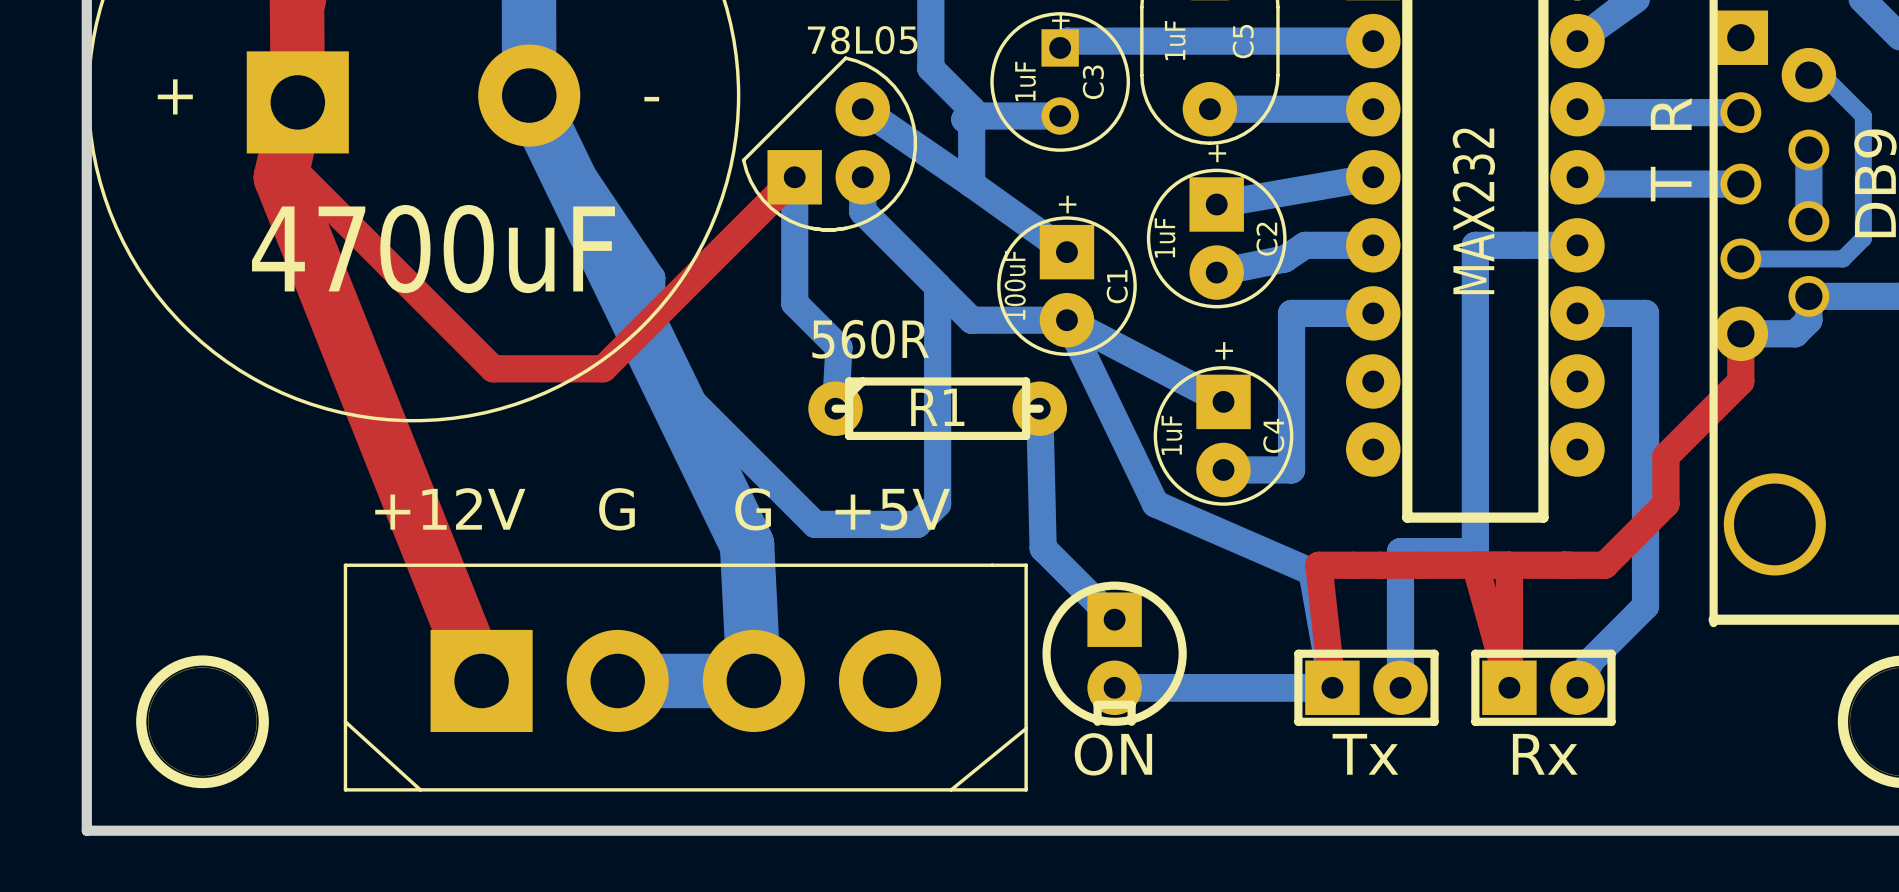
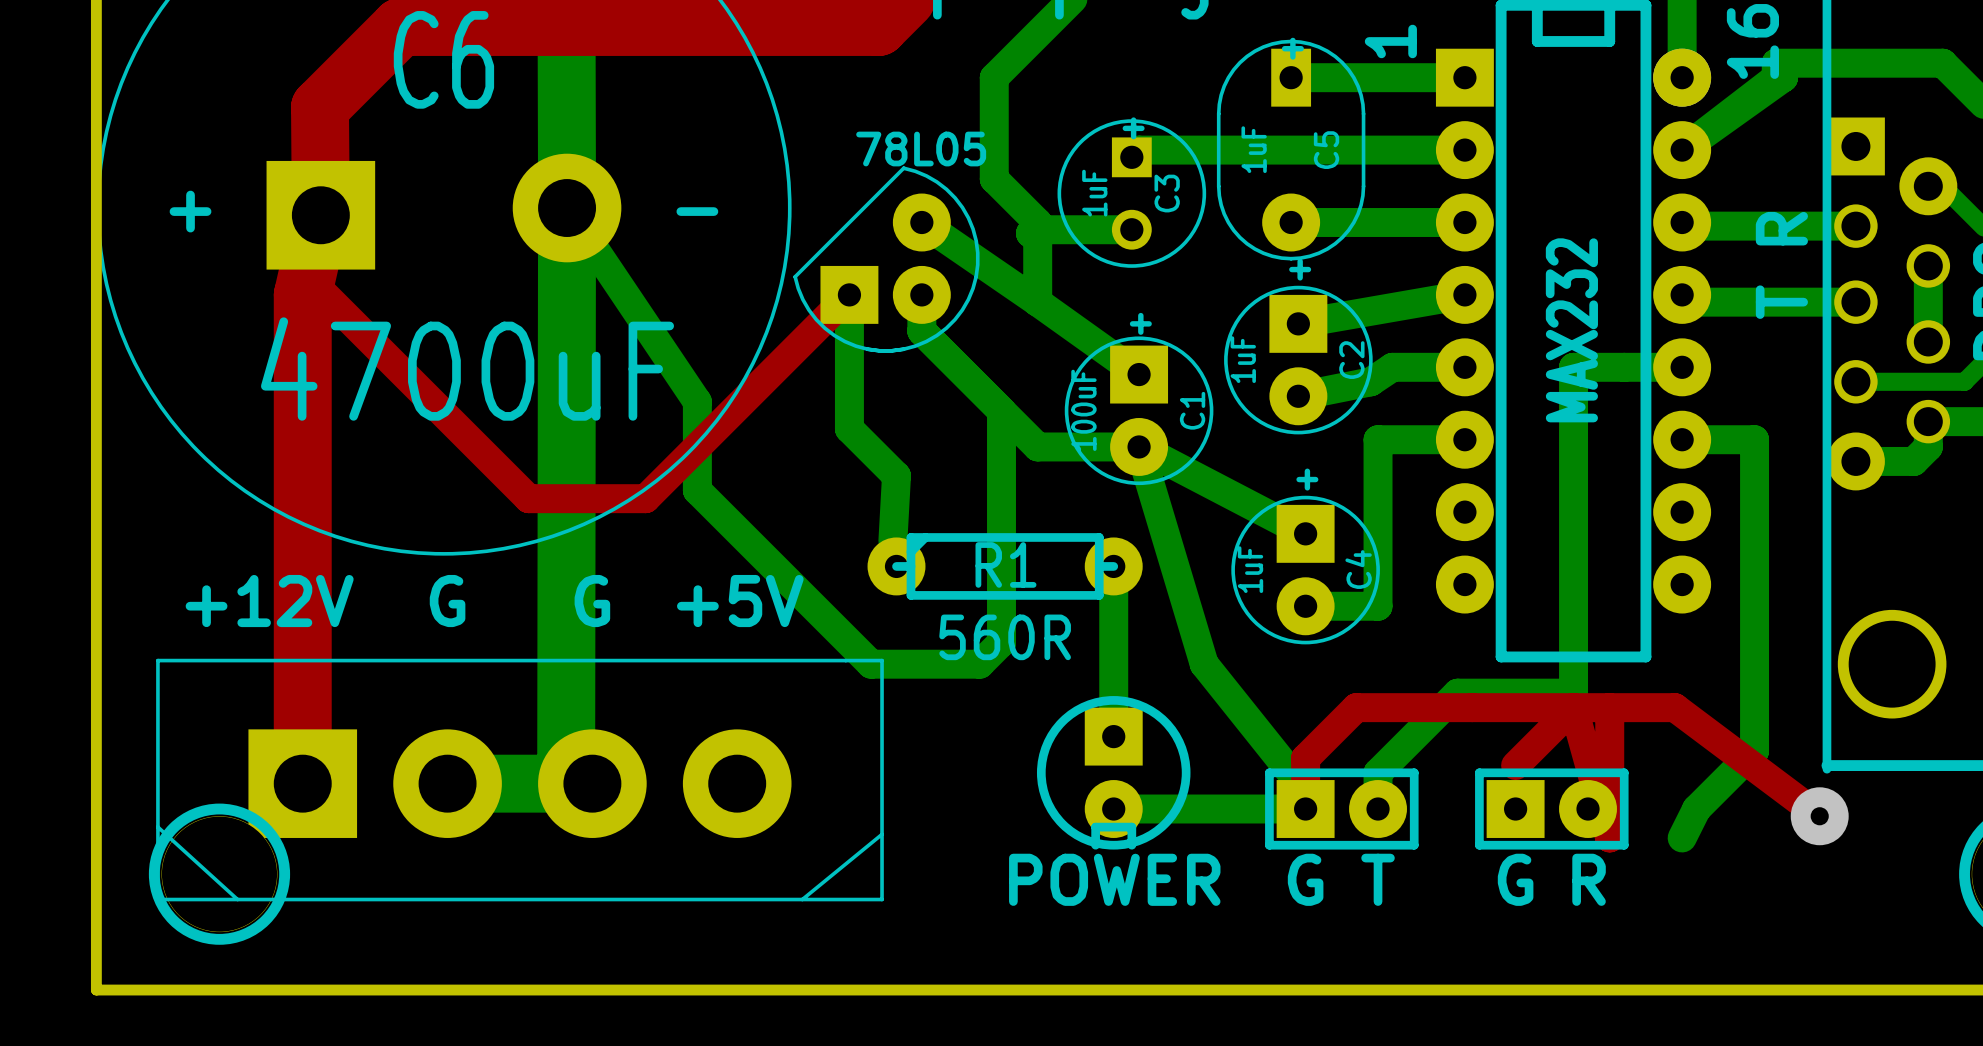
bottom track: (529, 95) (747, 544) (753, 680) (617, 680) -> (567, 208) (566, 771) (592, 783) (447, 783)
top track: (280, 177) (481, 680) -> (302, 295) (302, 783)
bottom track: (1066, 320) (1155, 503) (1312, 572) (1332, 687) (1107, 687) -> (1139, 446) (1204, 664) (1305, 791) (1305, 809) (1113, 809)
top track: (1740, 333) (1740, 381) (1665, 456) (1665, 503) (1604, 565) (1570, 565) -> (1819, 816) (1674, 707)
R1 value position: 560R (870, 339) -> 560R (1005, 637)
R1 position: (937, 408) -> (1005, 566)
bottom track: (1039, 408) (1043, 548) (1114, 619) -> none
bottom track: none -> (1113, 566) (1113, 736)
bottom track: (1400, 551) (1400, 687) -> (1493, 693) (1457, 693) (1378, 772) (1378, 809)
top track: (1318, 565) (1332, 687) -> (1406, 707) (1356, 707) (1305, 758) (1305, 809)
top track: none -> (1573, 707) (1515, 765)
part: none -> (1113, 772)
part: (1114, 653) -> none
part: none -> (1341, 809)
part: none -> (1551, 809)
via: none -> (1819, 816)
part position: (685, 677) -> (519, 780)
part: (1366, 687) -> none
part: (1543, 687) -> none

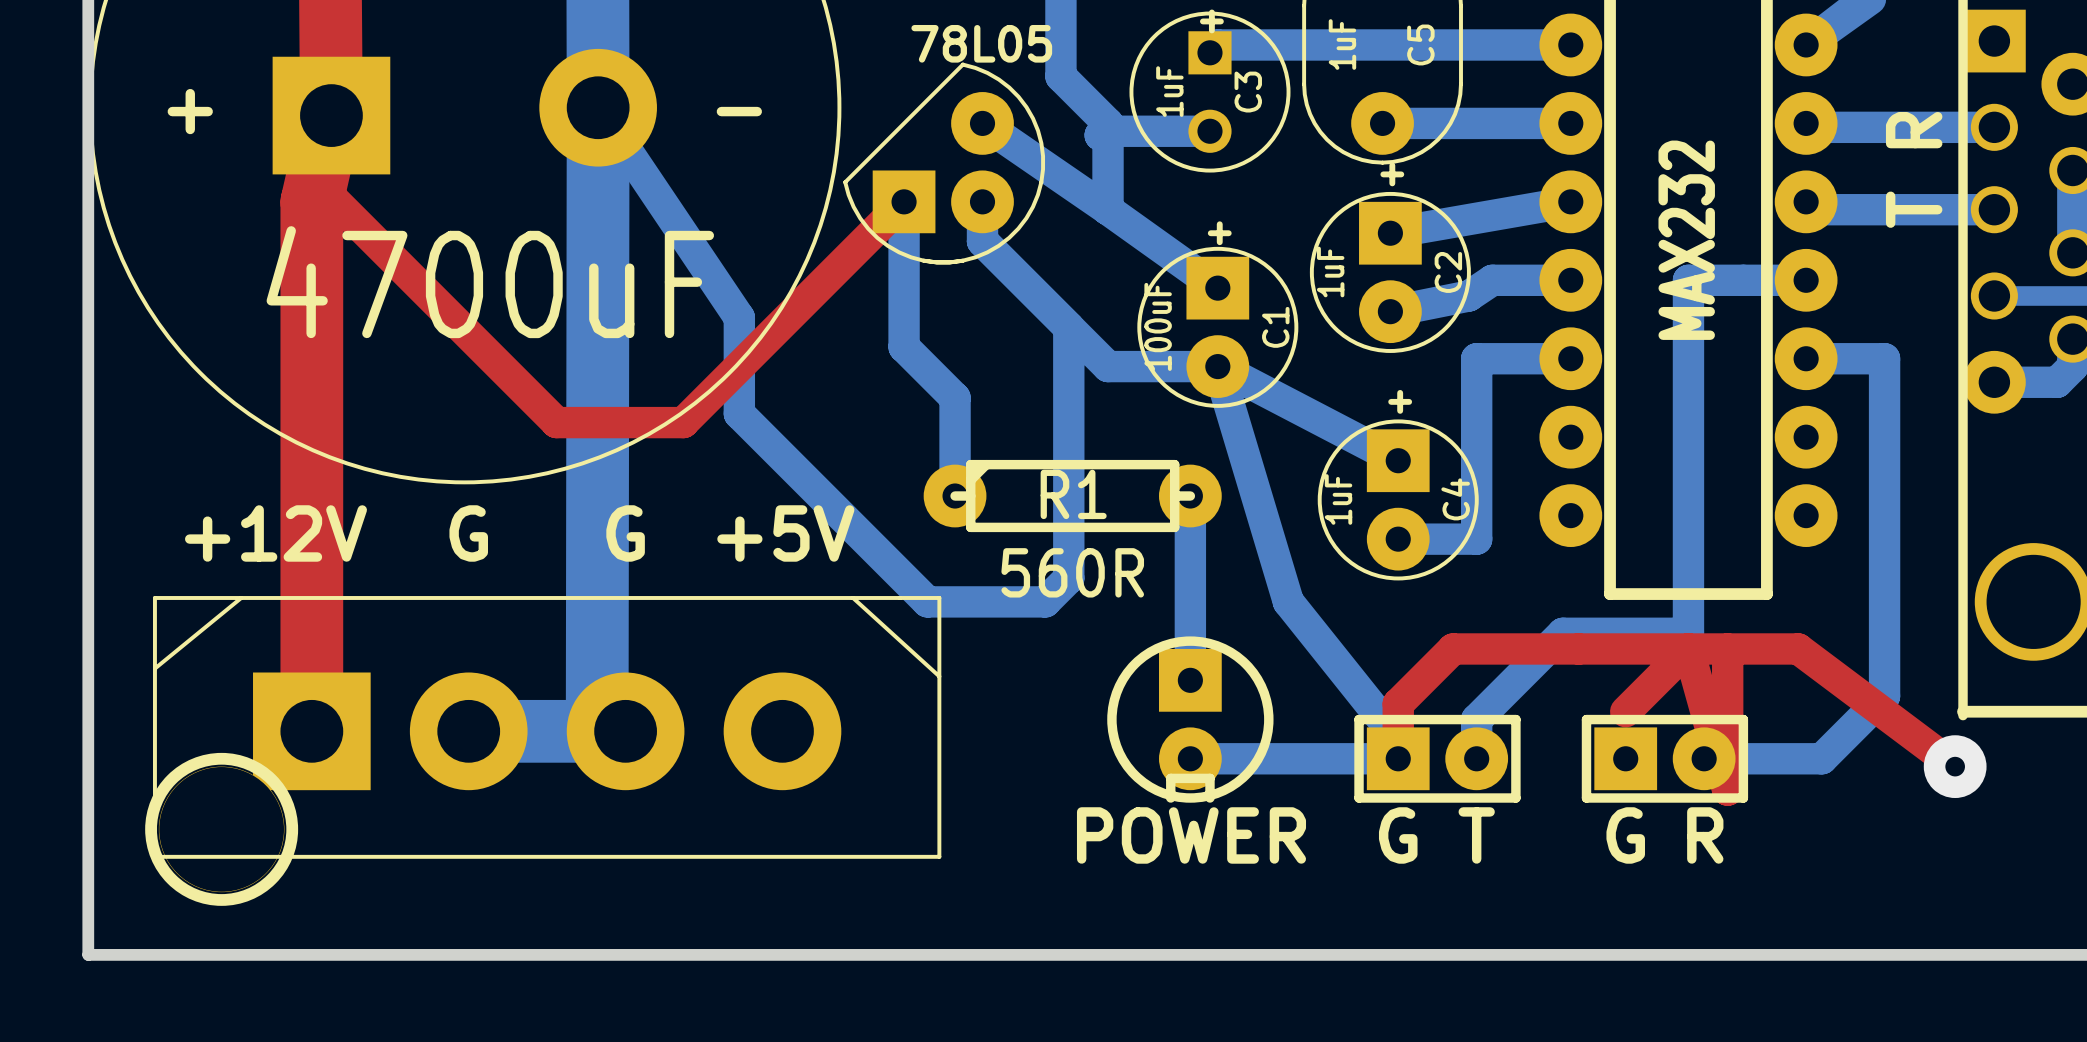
bottom track: (896, 475) (892, 541) -> (955, 397) (955, 496)
part footprint: [156, 658, 884, 902] -> [153, 596, 942, 859]
bottom track: (1696, 809) (1682, 837) -> (1821, 758) (1704, 758)

